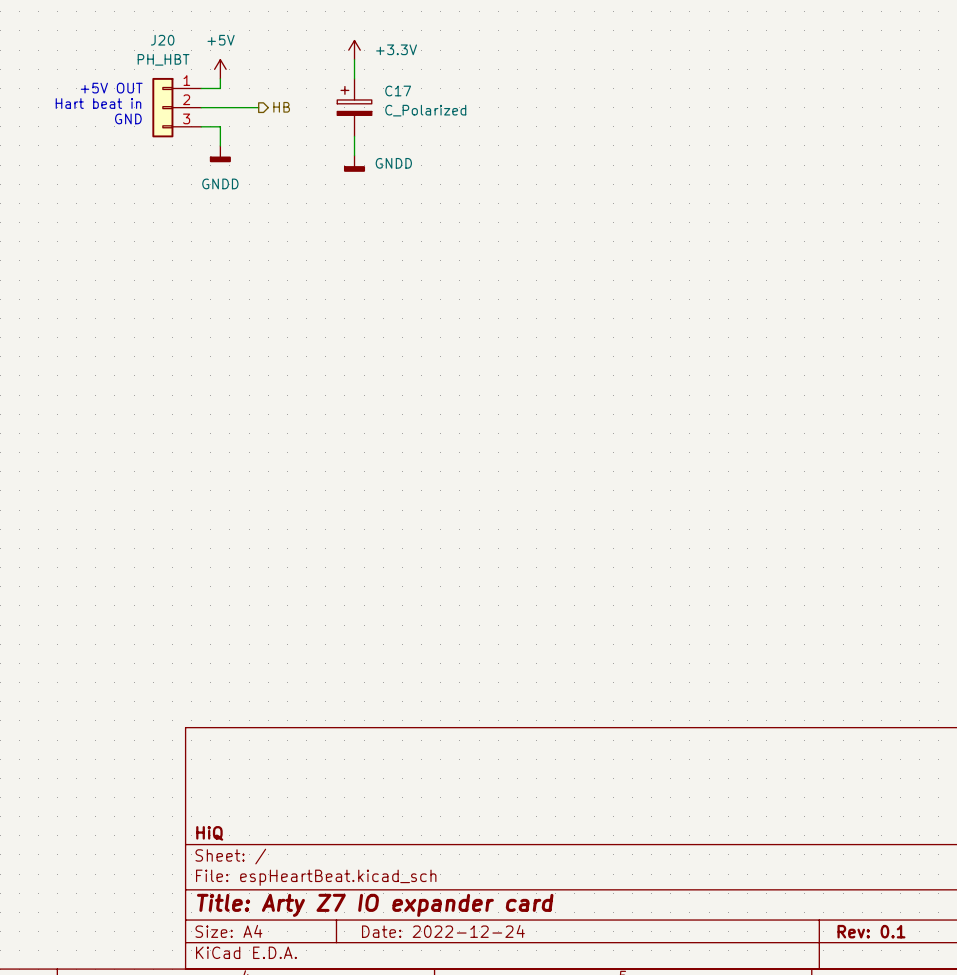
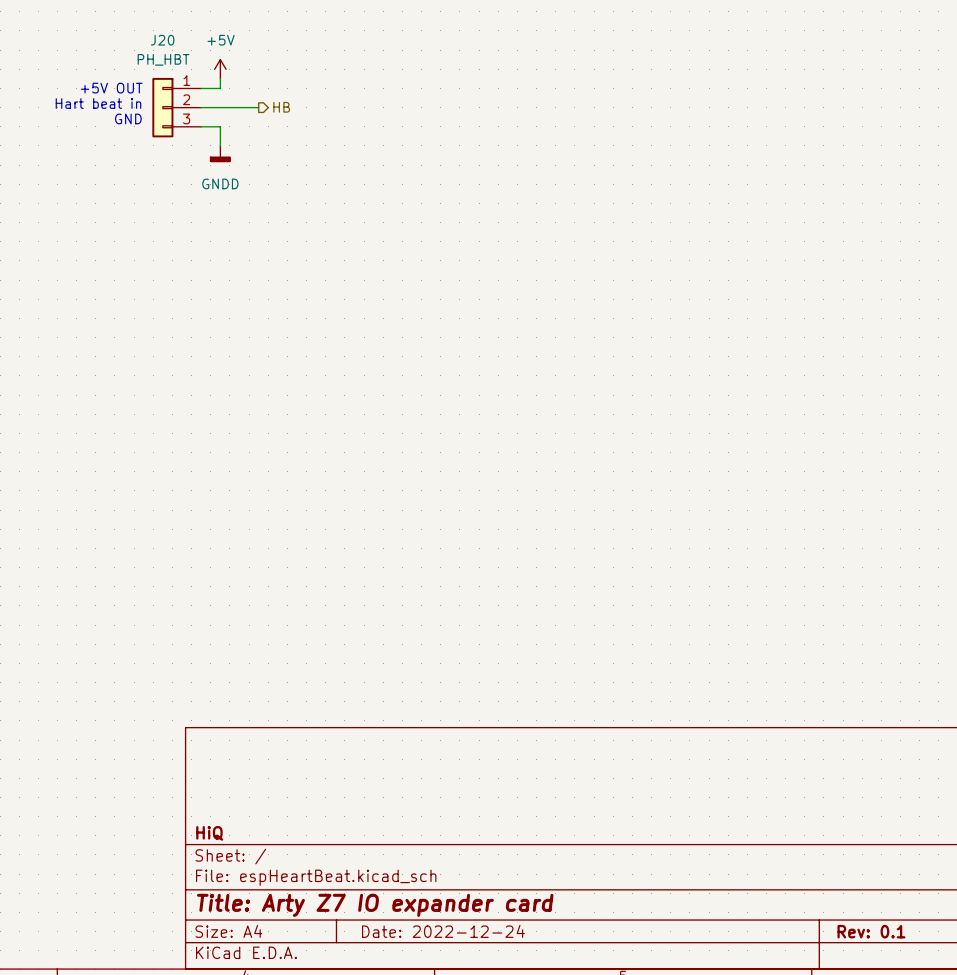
power symbol: +3.3V (354, 50) -> none
wire: (354, 59) (354, 78) -> none
C17: C_Polarized (354, 107) -> none
wire: (354, 136) (354, 155) -> none
power symbol: GNDD (354, 163) -> none

